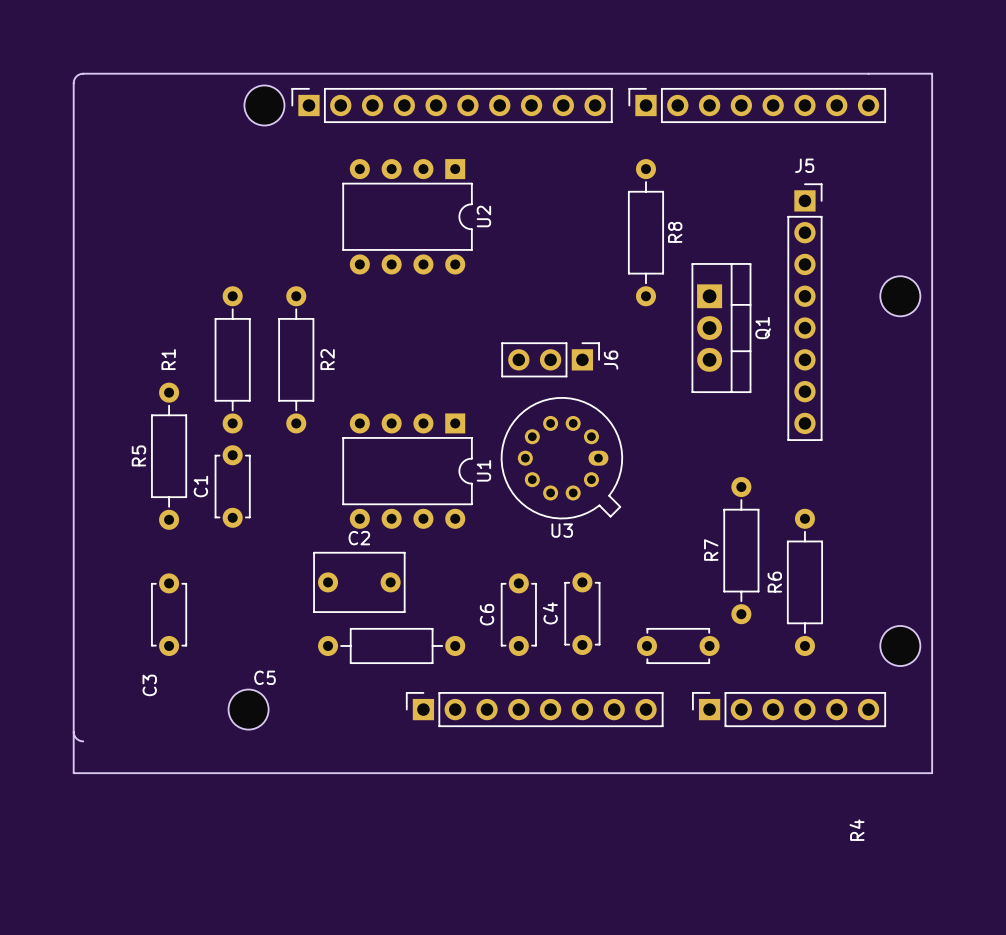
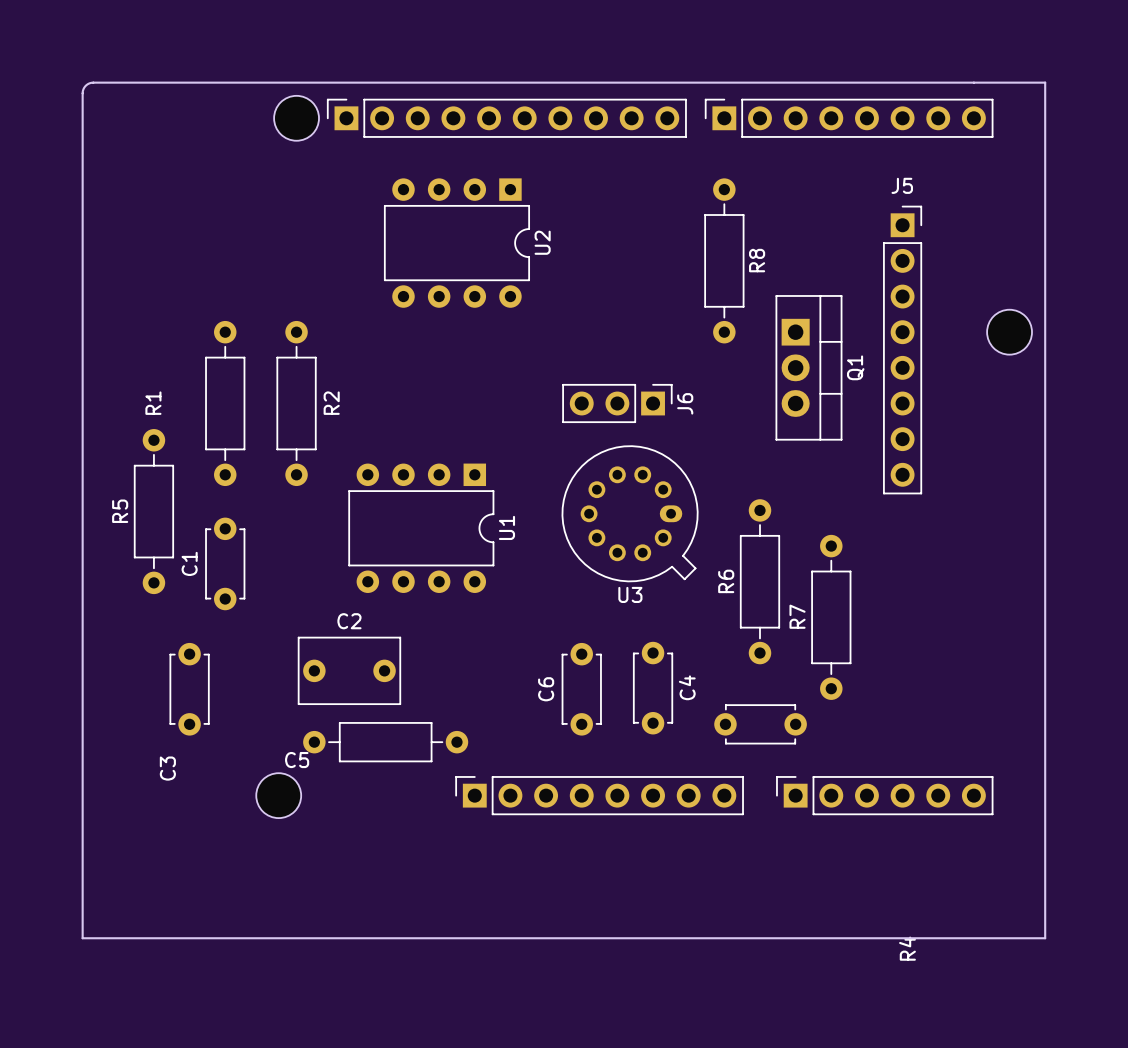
R1 position: (232, 359) -> (225, 403)
R2 position: (296, 359) -> (296, 403)
R5 position: (169, 456) -> (153, 511)
U1 position: (407, 471) -> (421, 528)
C1 position: (232, 486) -> (225, 563)
C2 position: (359, 582) -> (349, 670)
R6 position: (804, 582) -> (759, 581)
C4 name position: C4 (550, 613) -> C4 (687, 687)
R4 position: (391, 645) -> (385, 742)
part: (900, 645) -> none
board edge: (73, 731) (76, 738) (83, 741) -> none
board edge: (73, 773) (932, 773) -> (82, 866) (82, 938) (1045, 938) (1045, 866)

